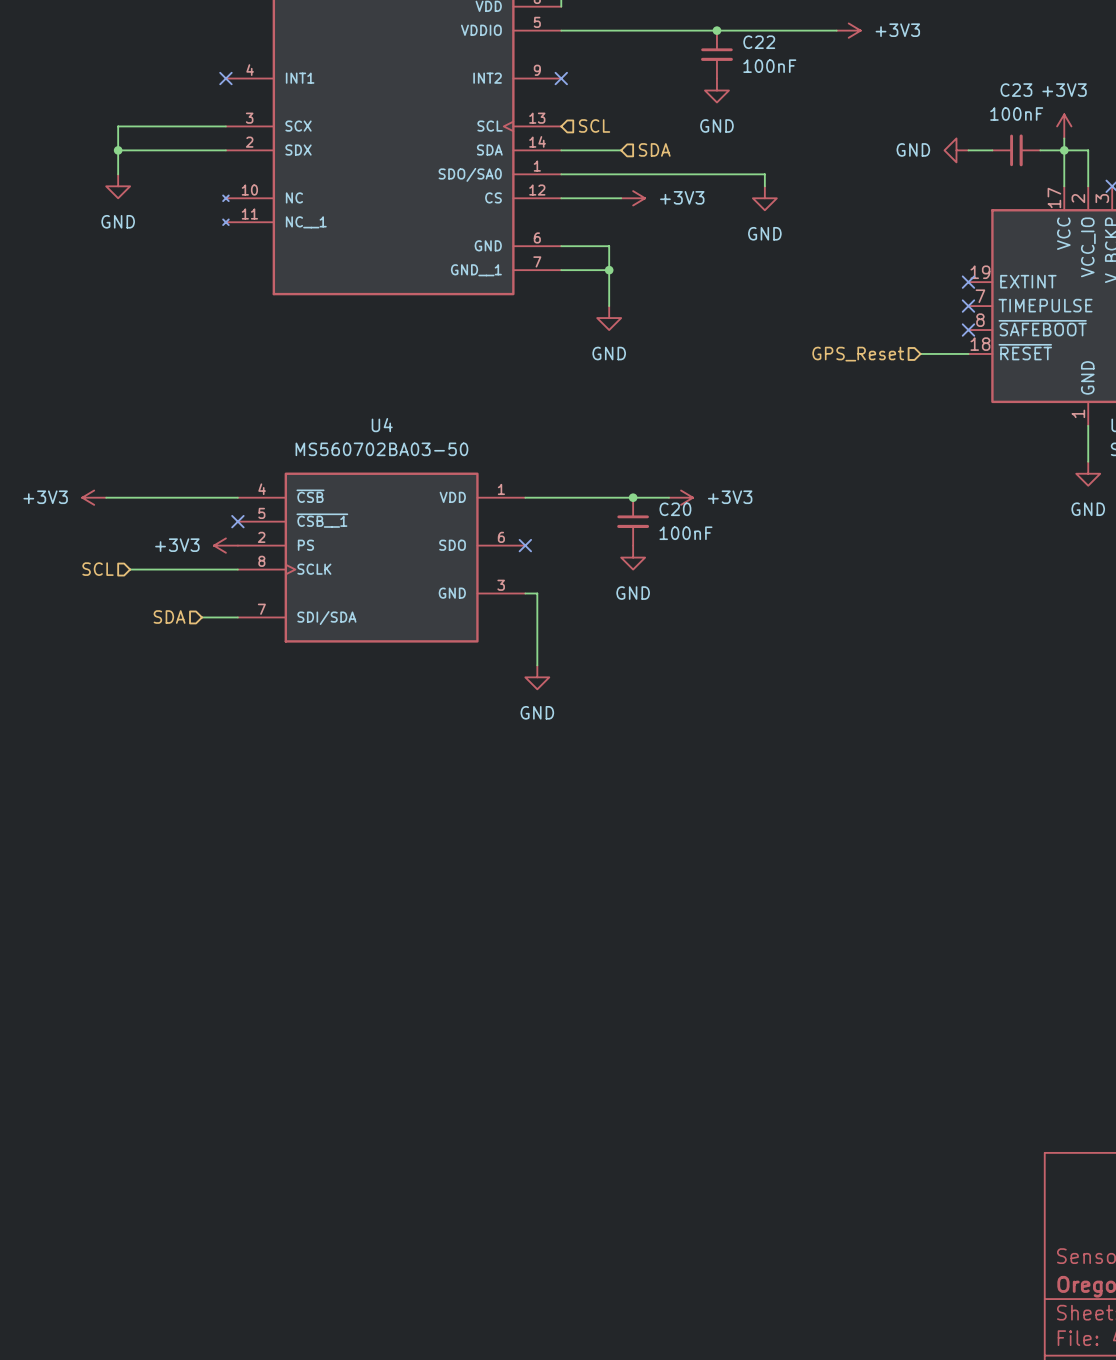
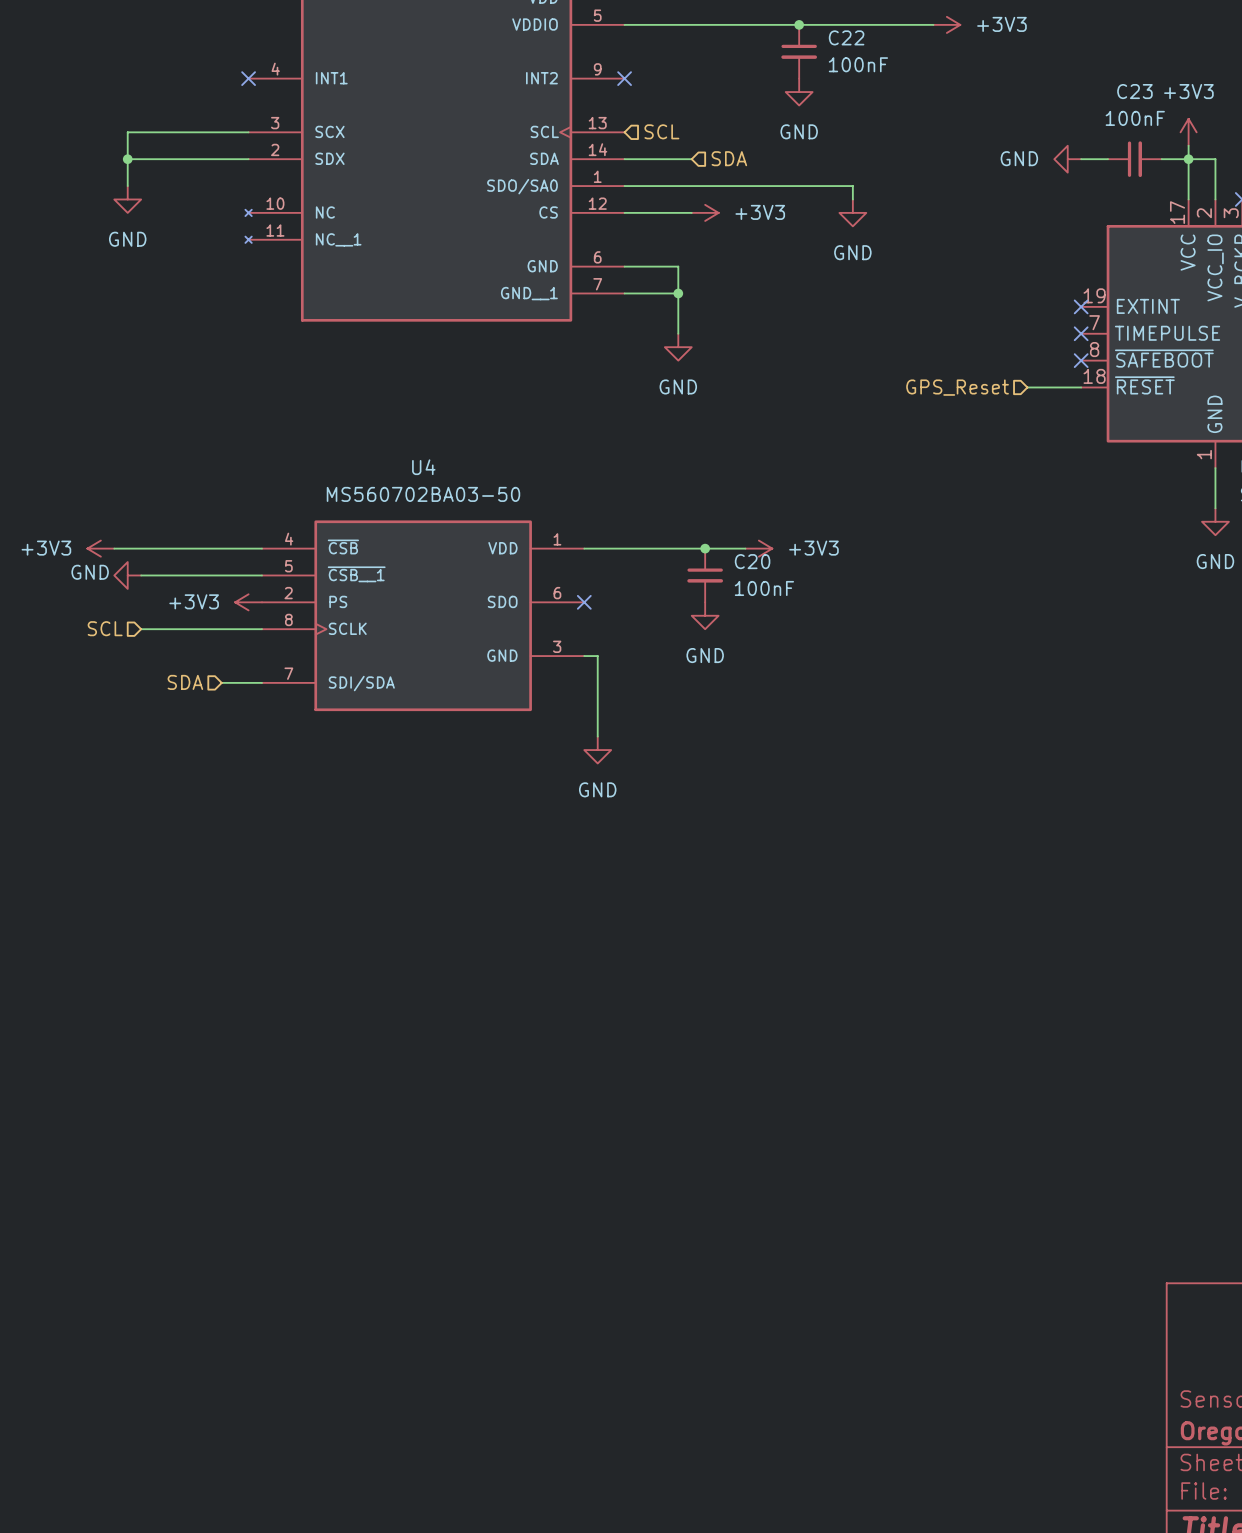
power symbol: none -> GND (127, 575)
wire: none -> (141, 575) (262, 575)
no-connect mark: (237, 521) -> none

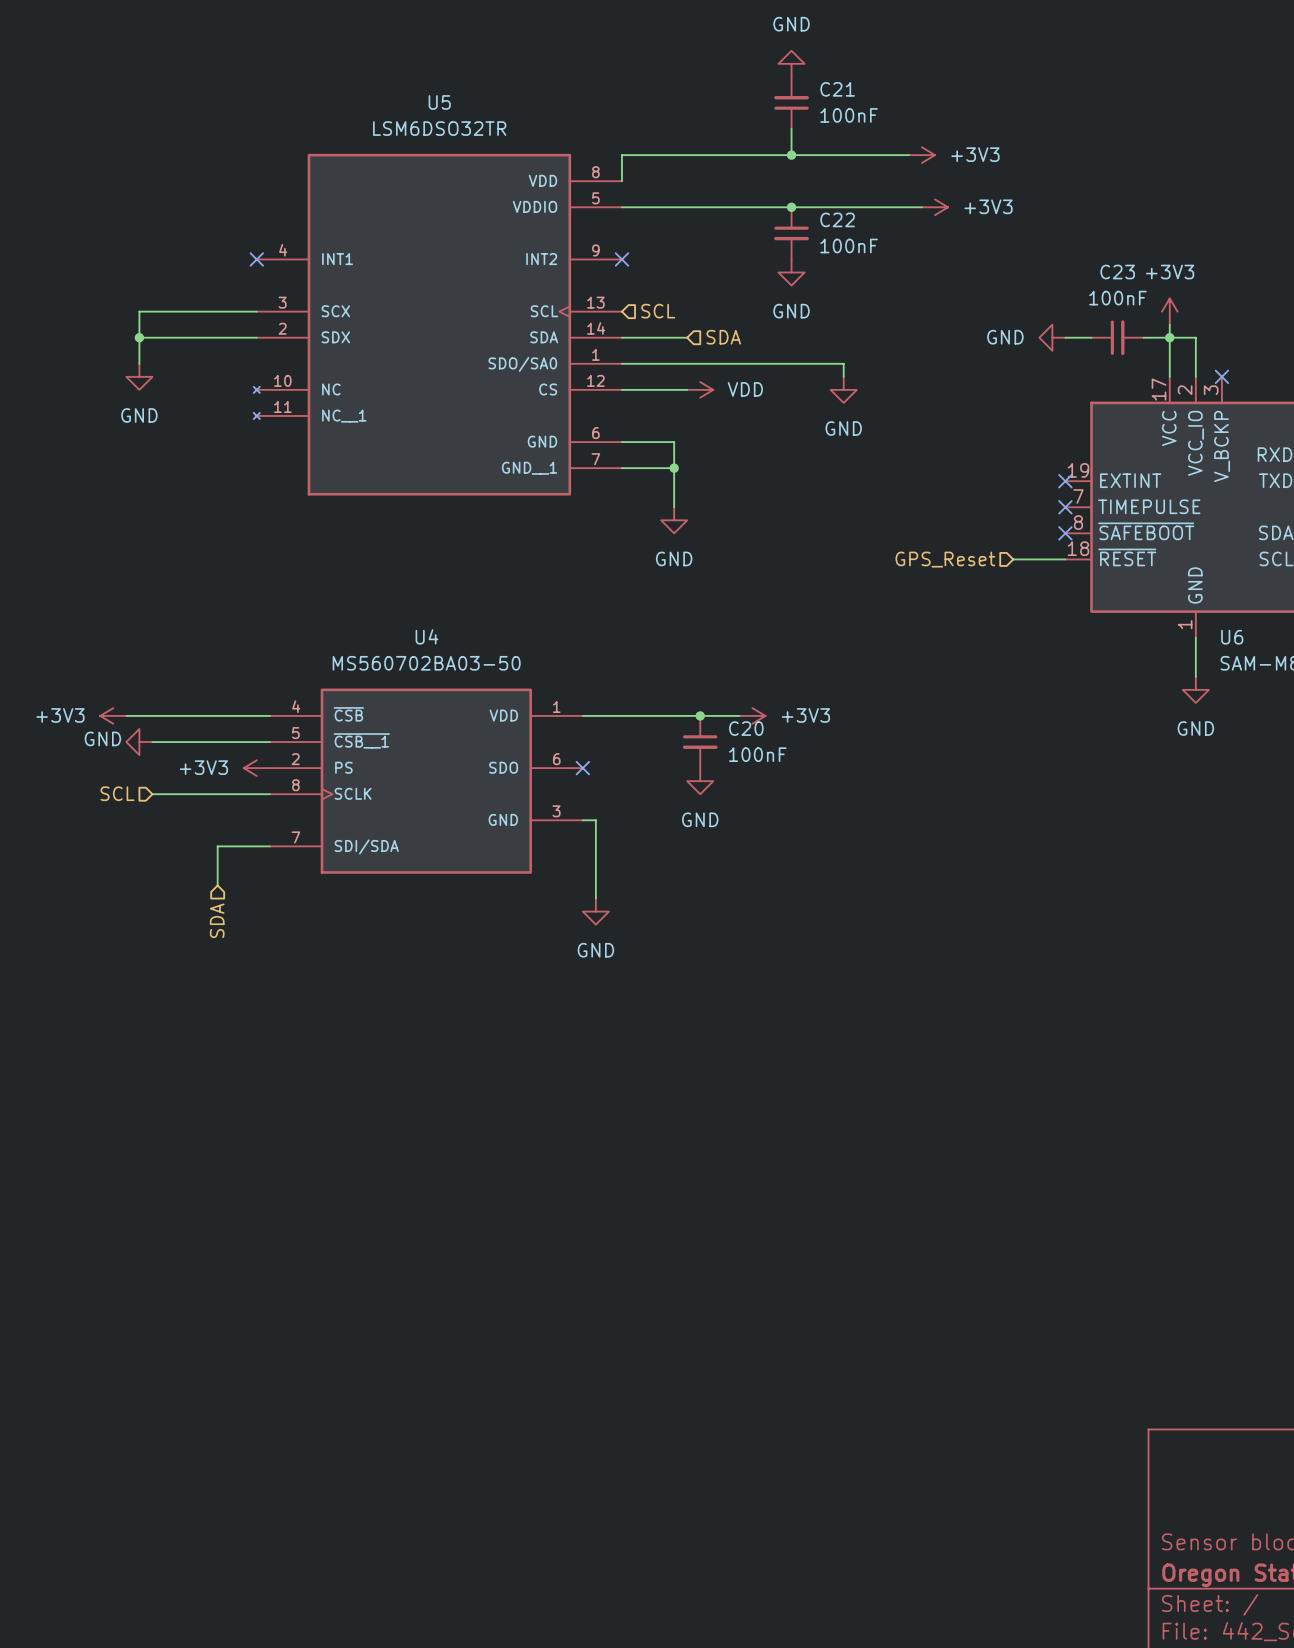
power symbol: +3V3 (705, 212) -> VDD (700, 389)
hierarchical label rotation: 0° (185, 682) -> 90° counterclockwise (217, 920)
hierarchical label position: SDA (185, 682) -> SDA (217, 920)
wire: none -> (230, 846) (217, 846) (217, 885)

